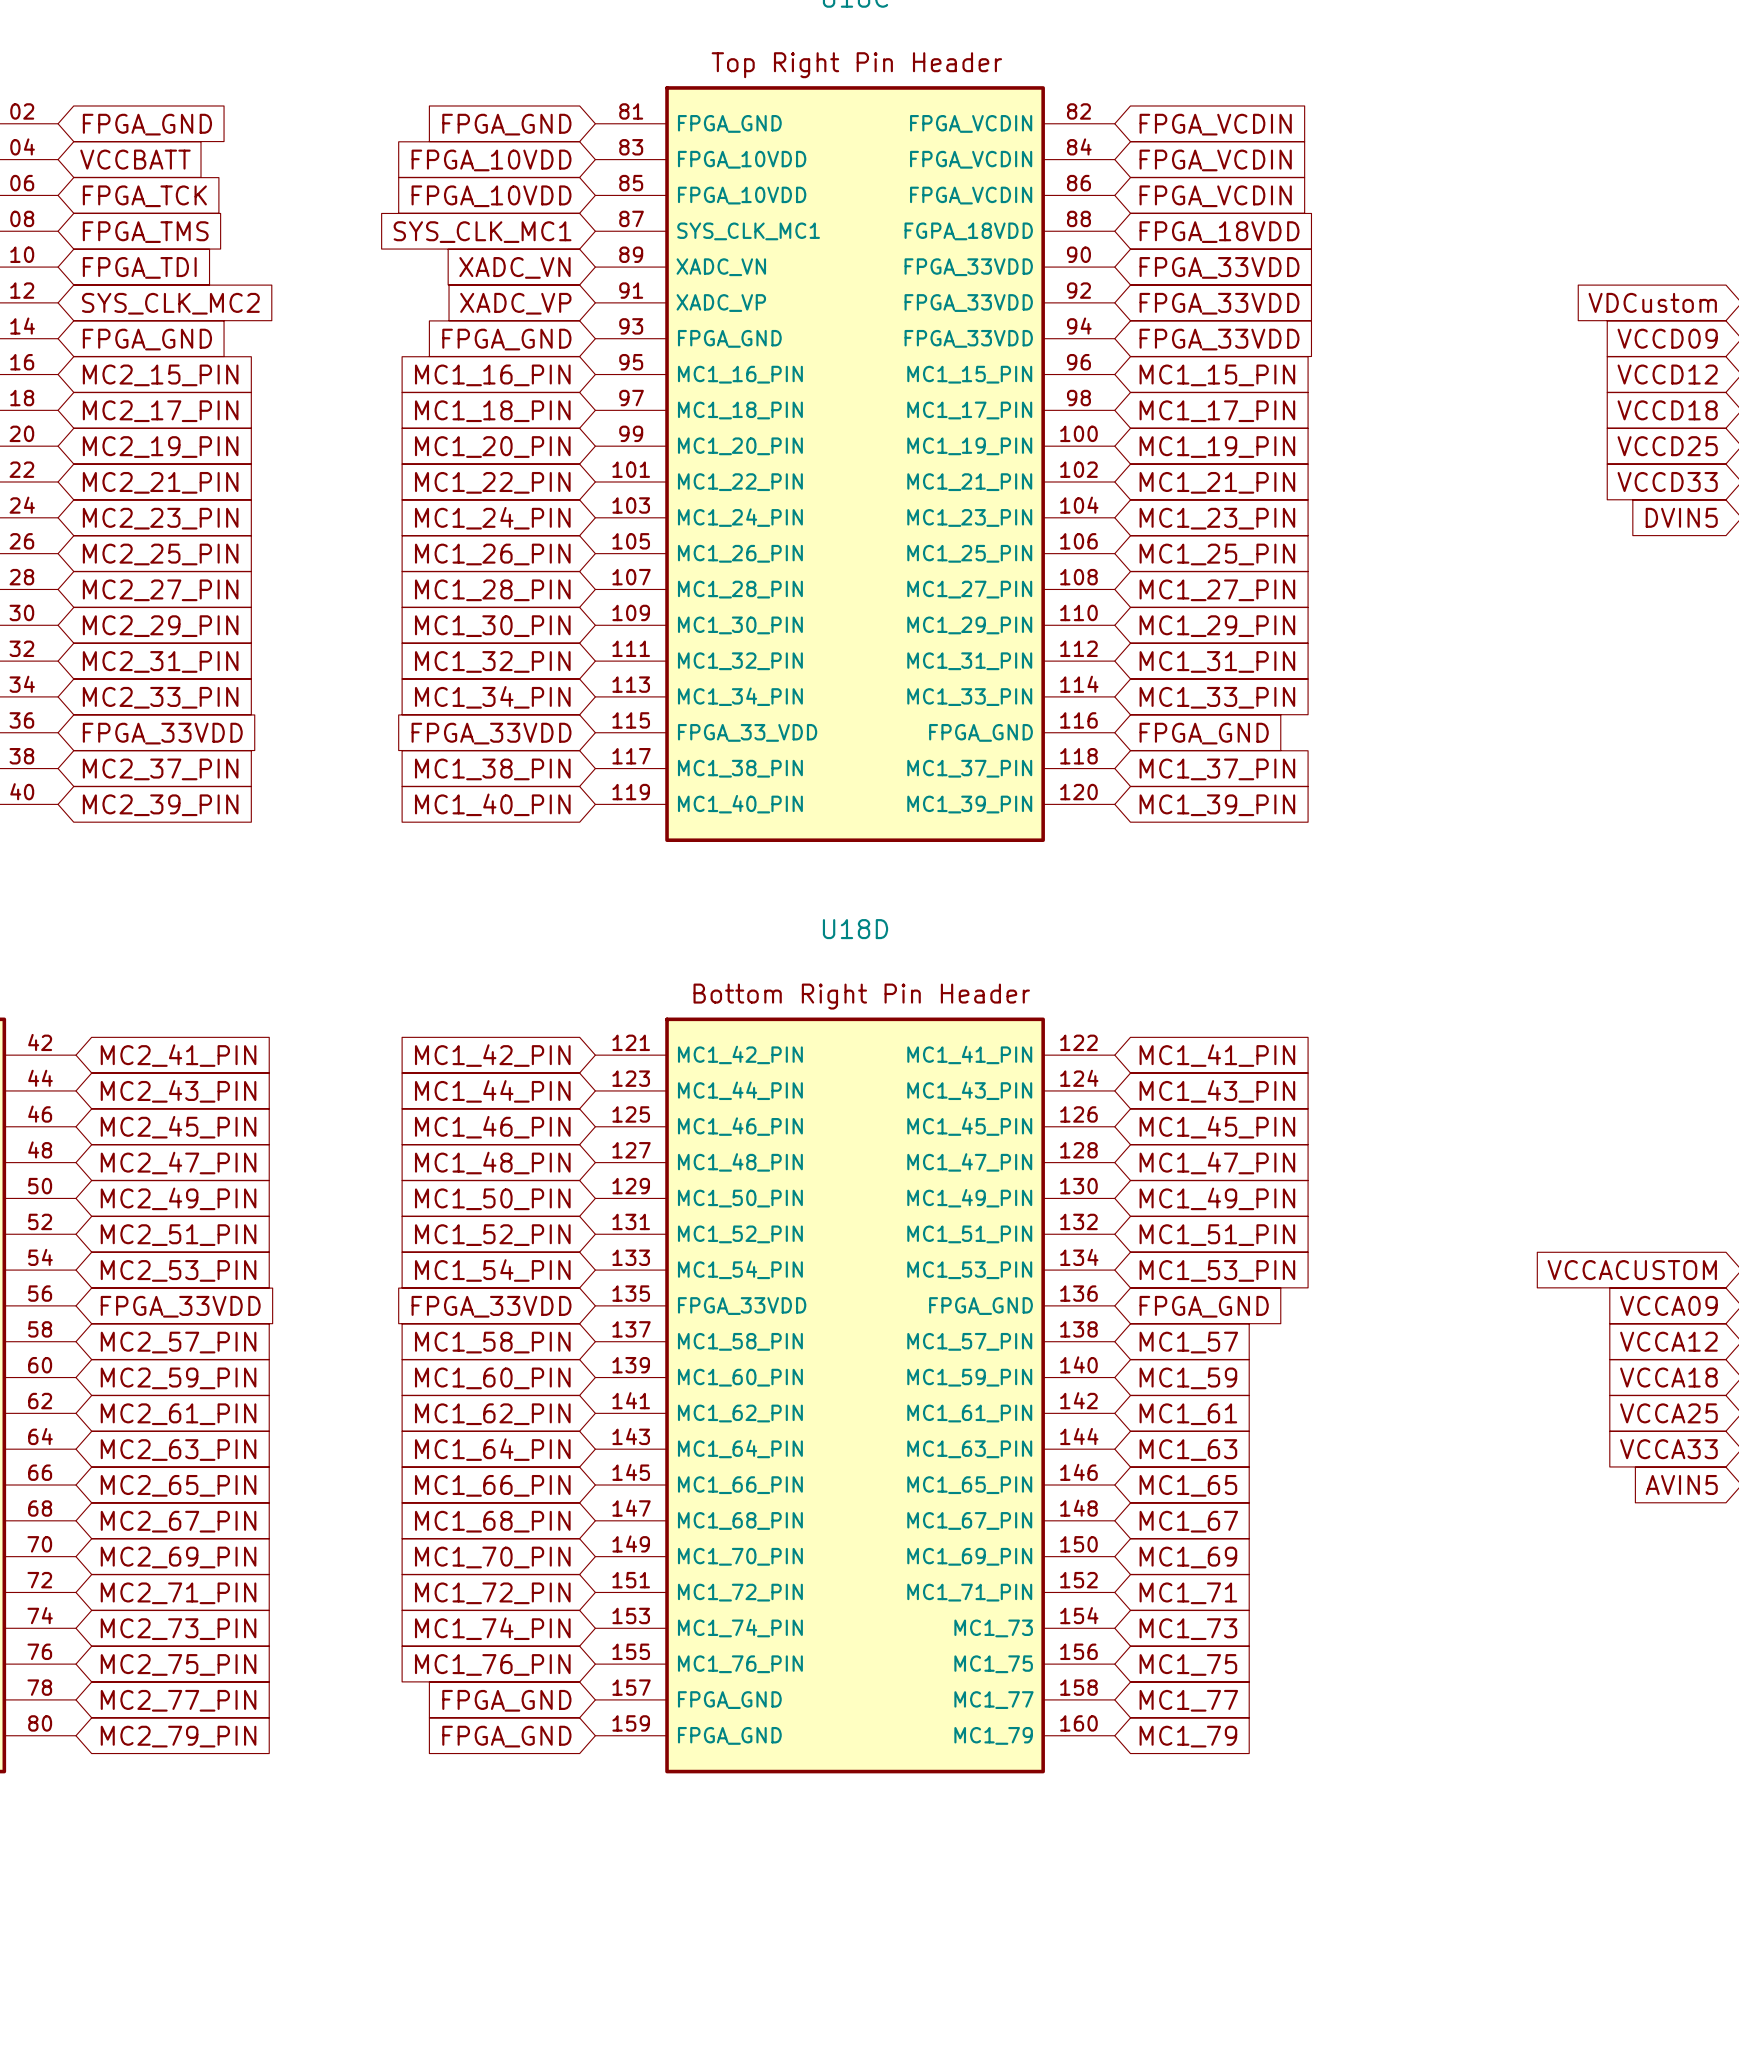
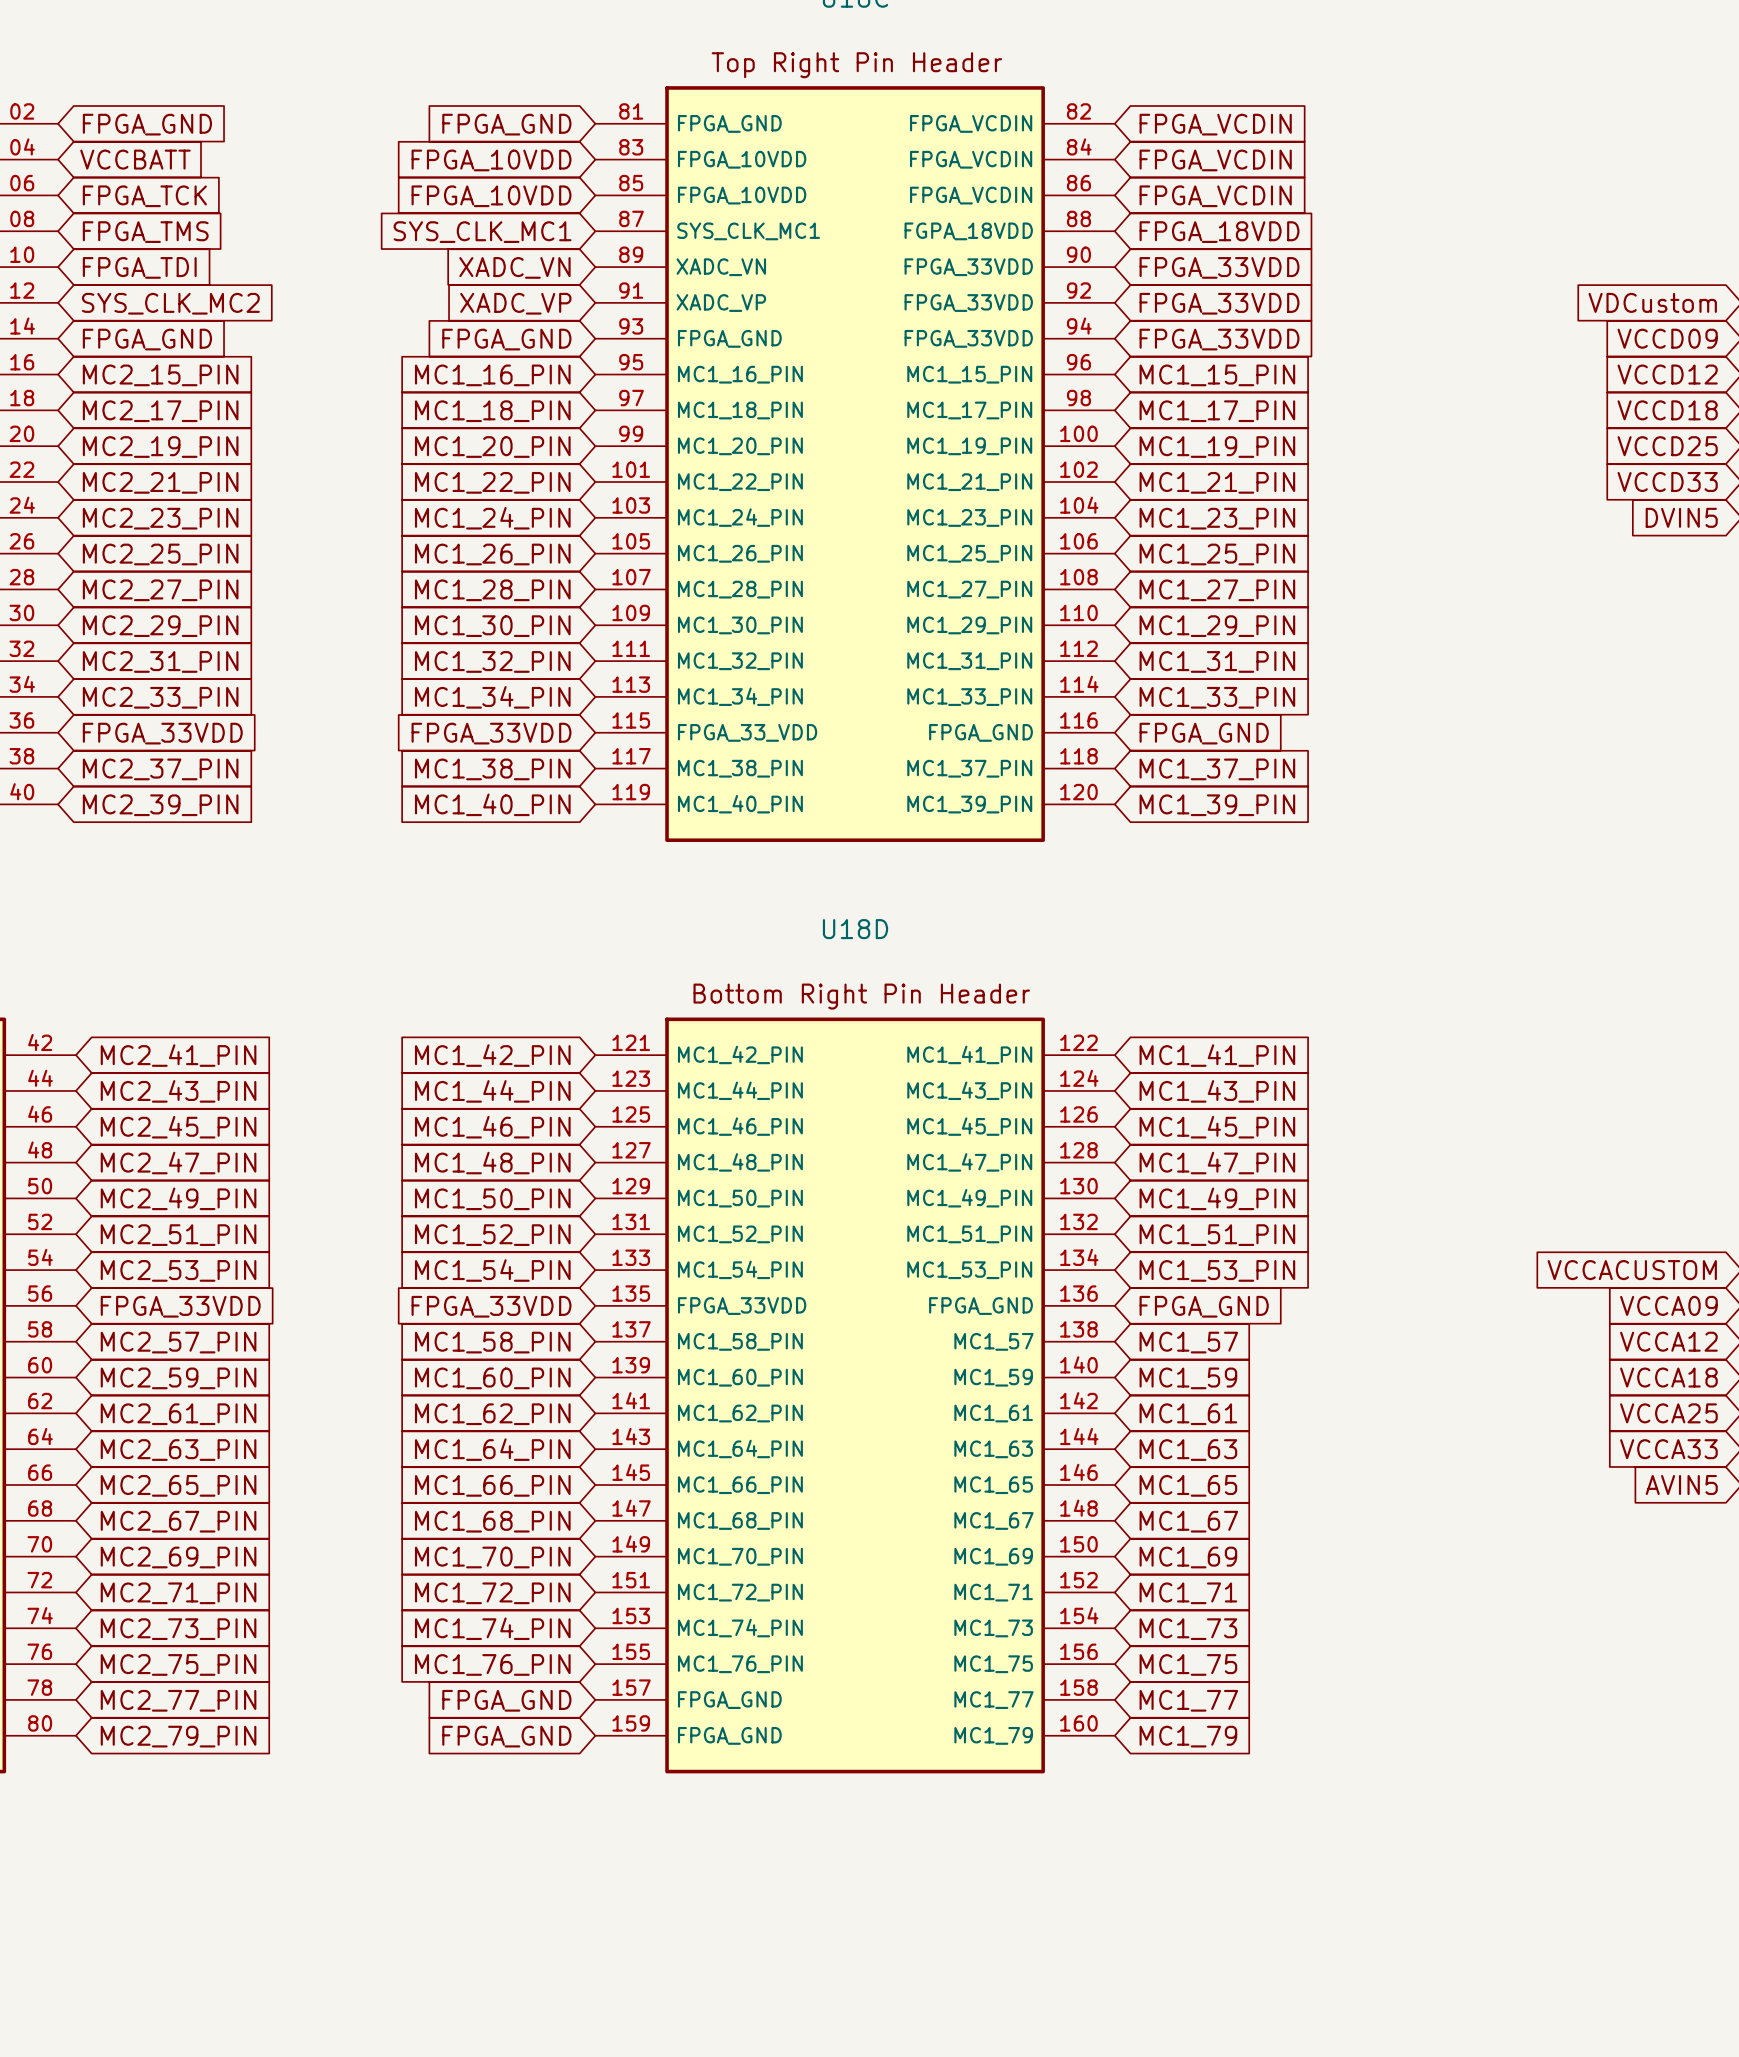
U18D pin name: MC1_57_PIN (969, 1341) -> MC1_57 (993, 1341)
U18D pin name: MC1_59_PIN (969, 1377) -> MC1_59 (993, 1377)
U18D pin name: MC1_61_PIN (969, 1413) -> MC1_61 (993, 1413)
U18D pin name: MC1_63_PIN (969, 1449) -> MC1_63 (993, 1449)
U18D pin name: MC1_65_PIN (969, 1485) -> MC1_65 (993, 1485)
U18D pin name: MC1_67_PIN (969, 1520) -> MC1_67 (993, 1520)
U18D pin name: MC1_69_PIN (969, 1556) -> MC1_69 (993, 1556)
U18D pin name: MC1_71_PIN (969, 1592) -> MC1_71 (993, 1592)

